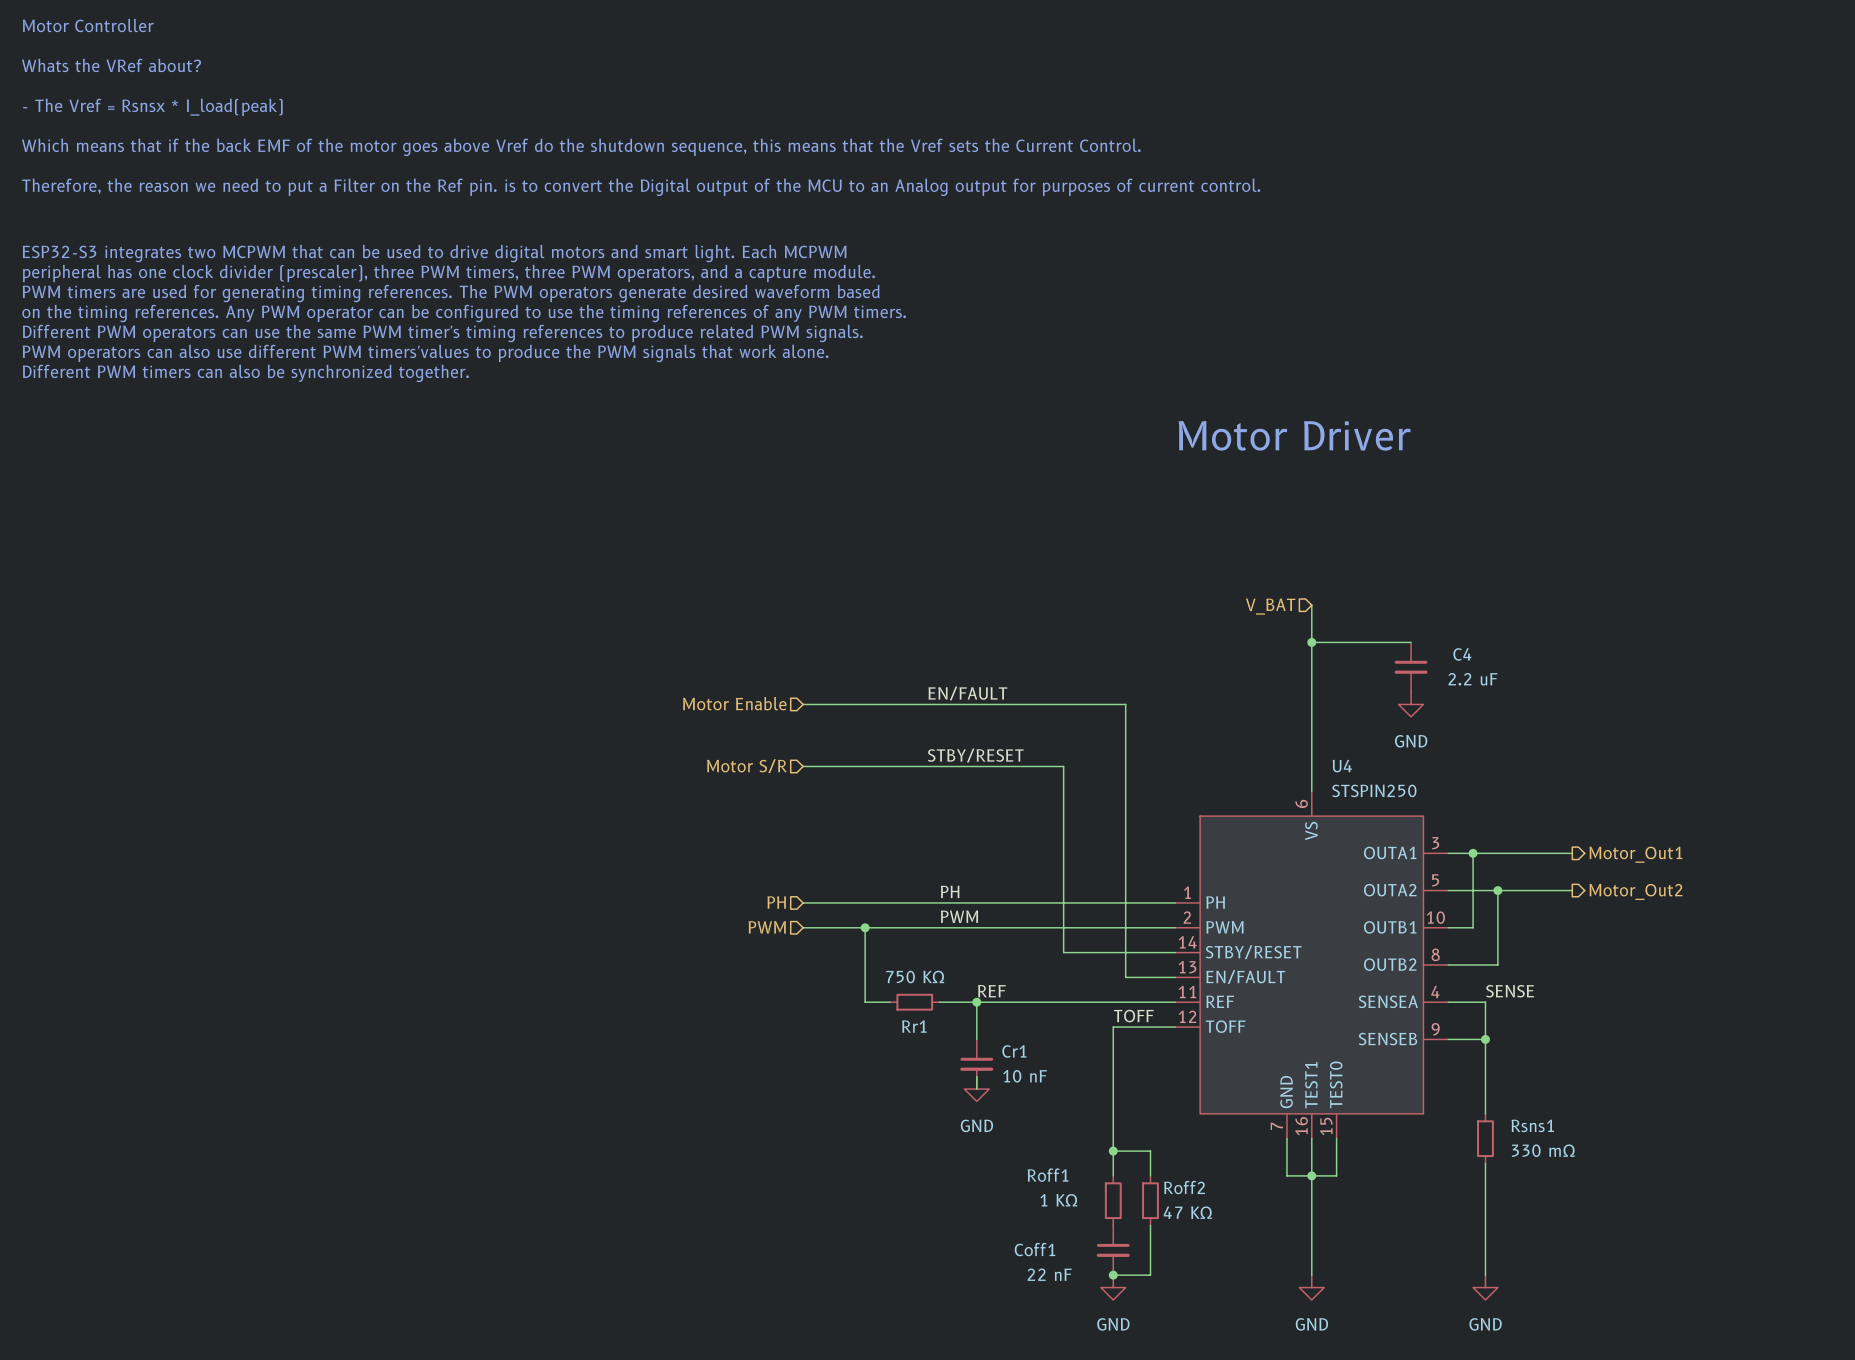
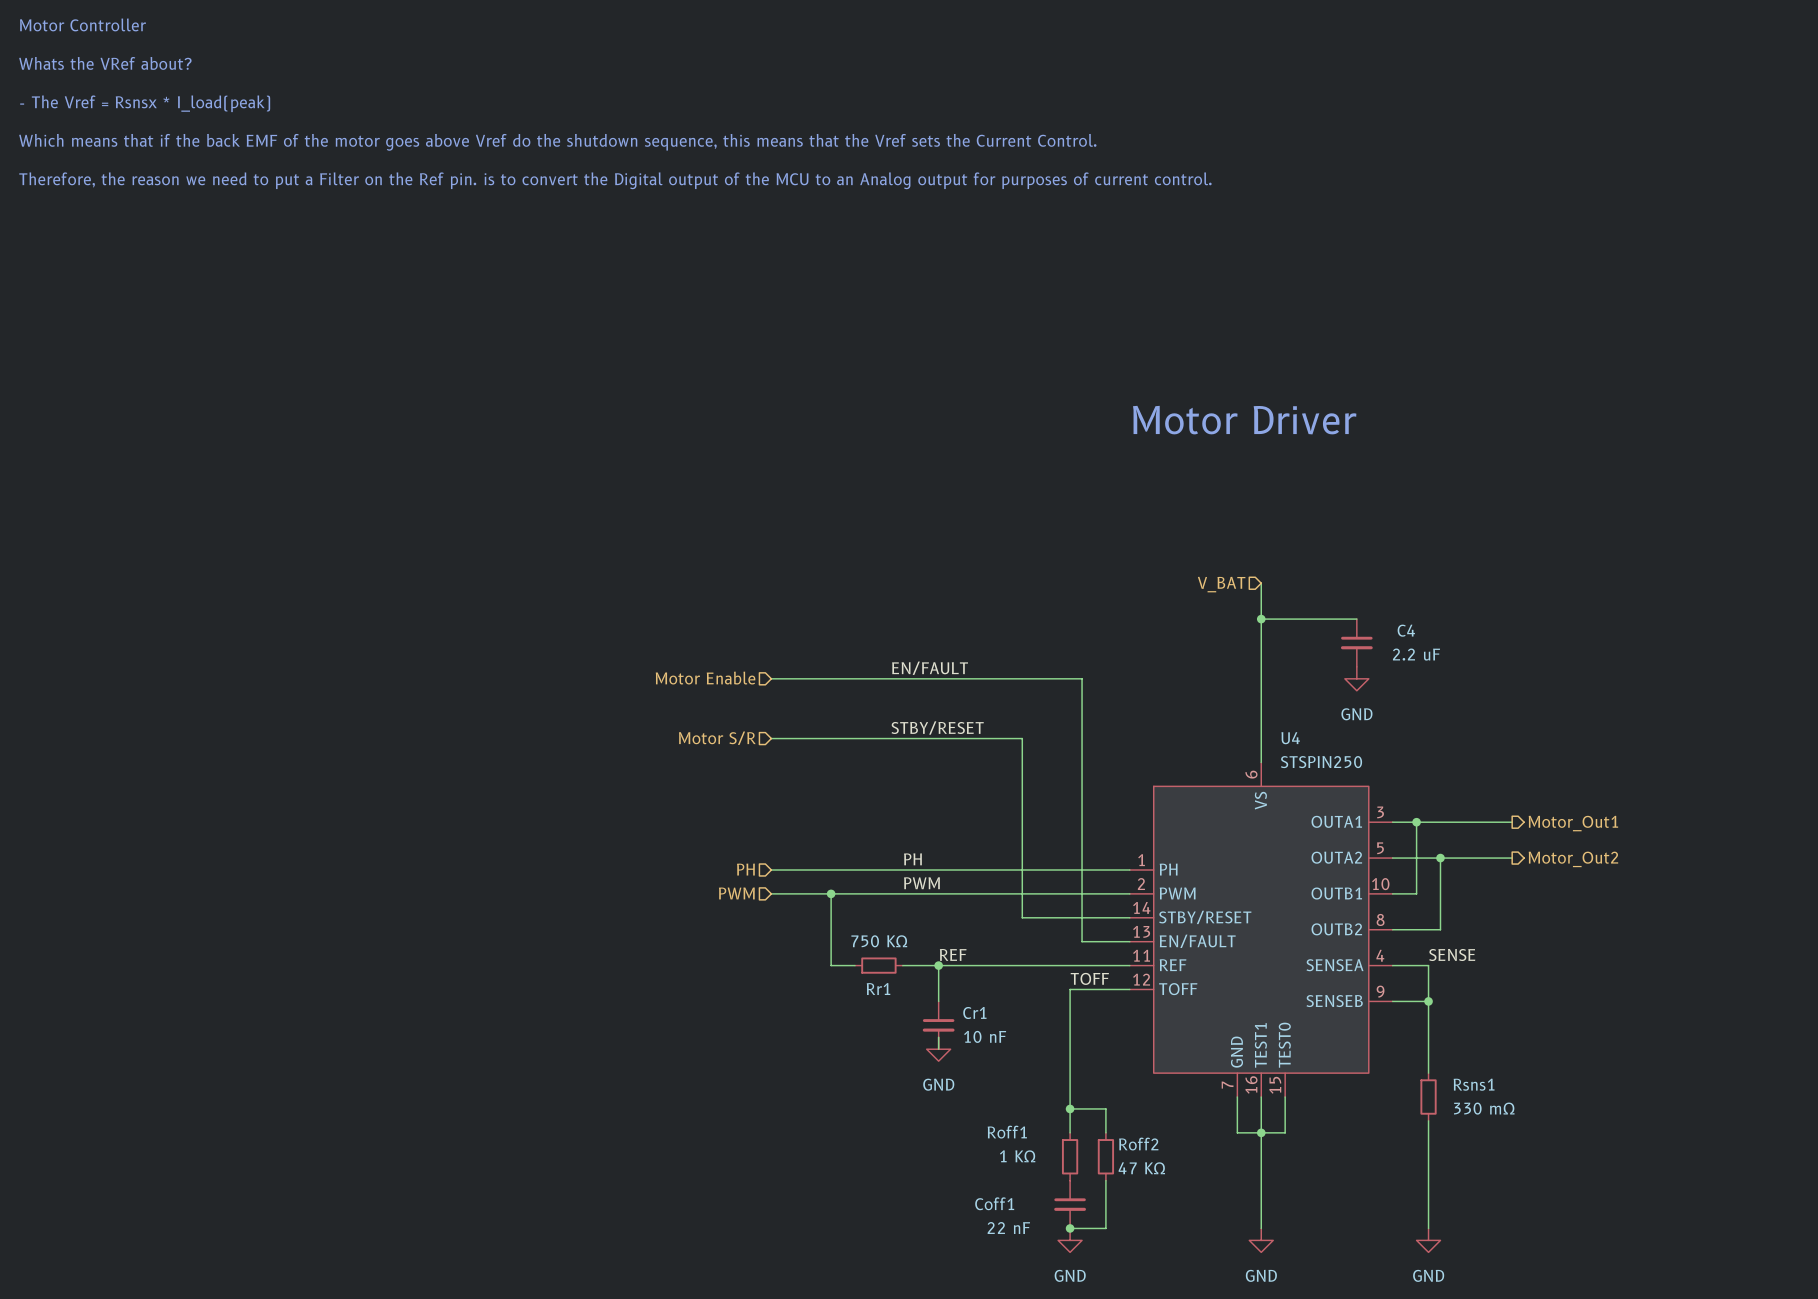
text: ESP32-S3 integrates two MCPWM that can be used to drive digital motors and smart light. Each MCPWM (434, 253) -> none
text: peripheral has one clock divider (prescaler), three PWM timers, three PWM operators, and a capture module. (449, 273) -> none
text: PWM timers are used for generating timing references. The PWM operators generate desired waveform based (451, 293) -> none
text: on the timing references. Any PWM operator can be configured to use the timing references of any PWM timers. (464, 313) -> none
text: Different PWM operators can use the same PWM timer's timing references to produce related PWM signals. (442, 333) -> none
text: PWM operators can also use different PWM timers'values to produce the PWM signals that work alone. (425, 353) -> none
text: Different PWM timers can also be synchronized together. (245, 373) -> none

